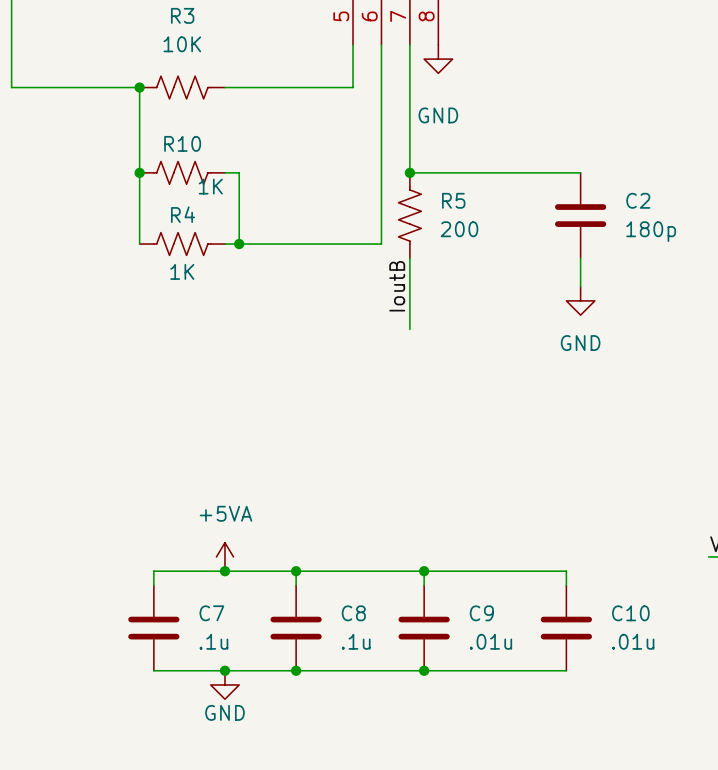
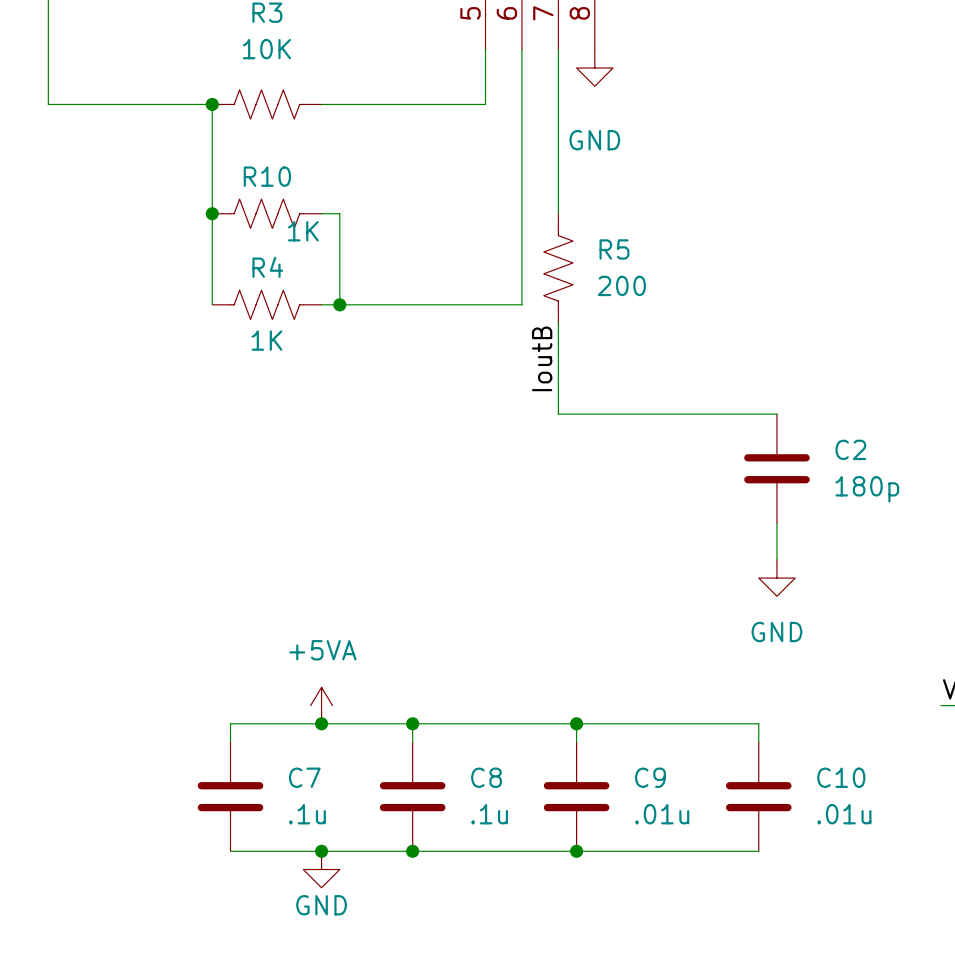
wire: (409, 172) (580, 172) -> (558, 414) (776, 414)
junction: (409, 172) -> none
C2 position: (580, 215) -> (776, 468)
wire: (580, 258) (580, 286) -> (776, 523) (776, 559)
power symbol position: GND (580, 300) -> GND (776, 578)

